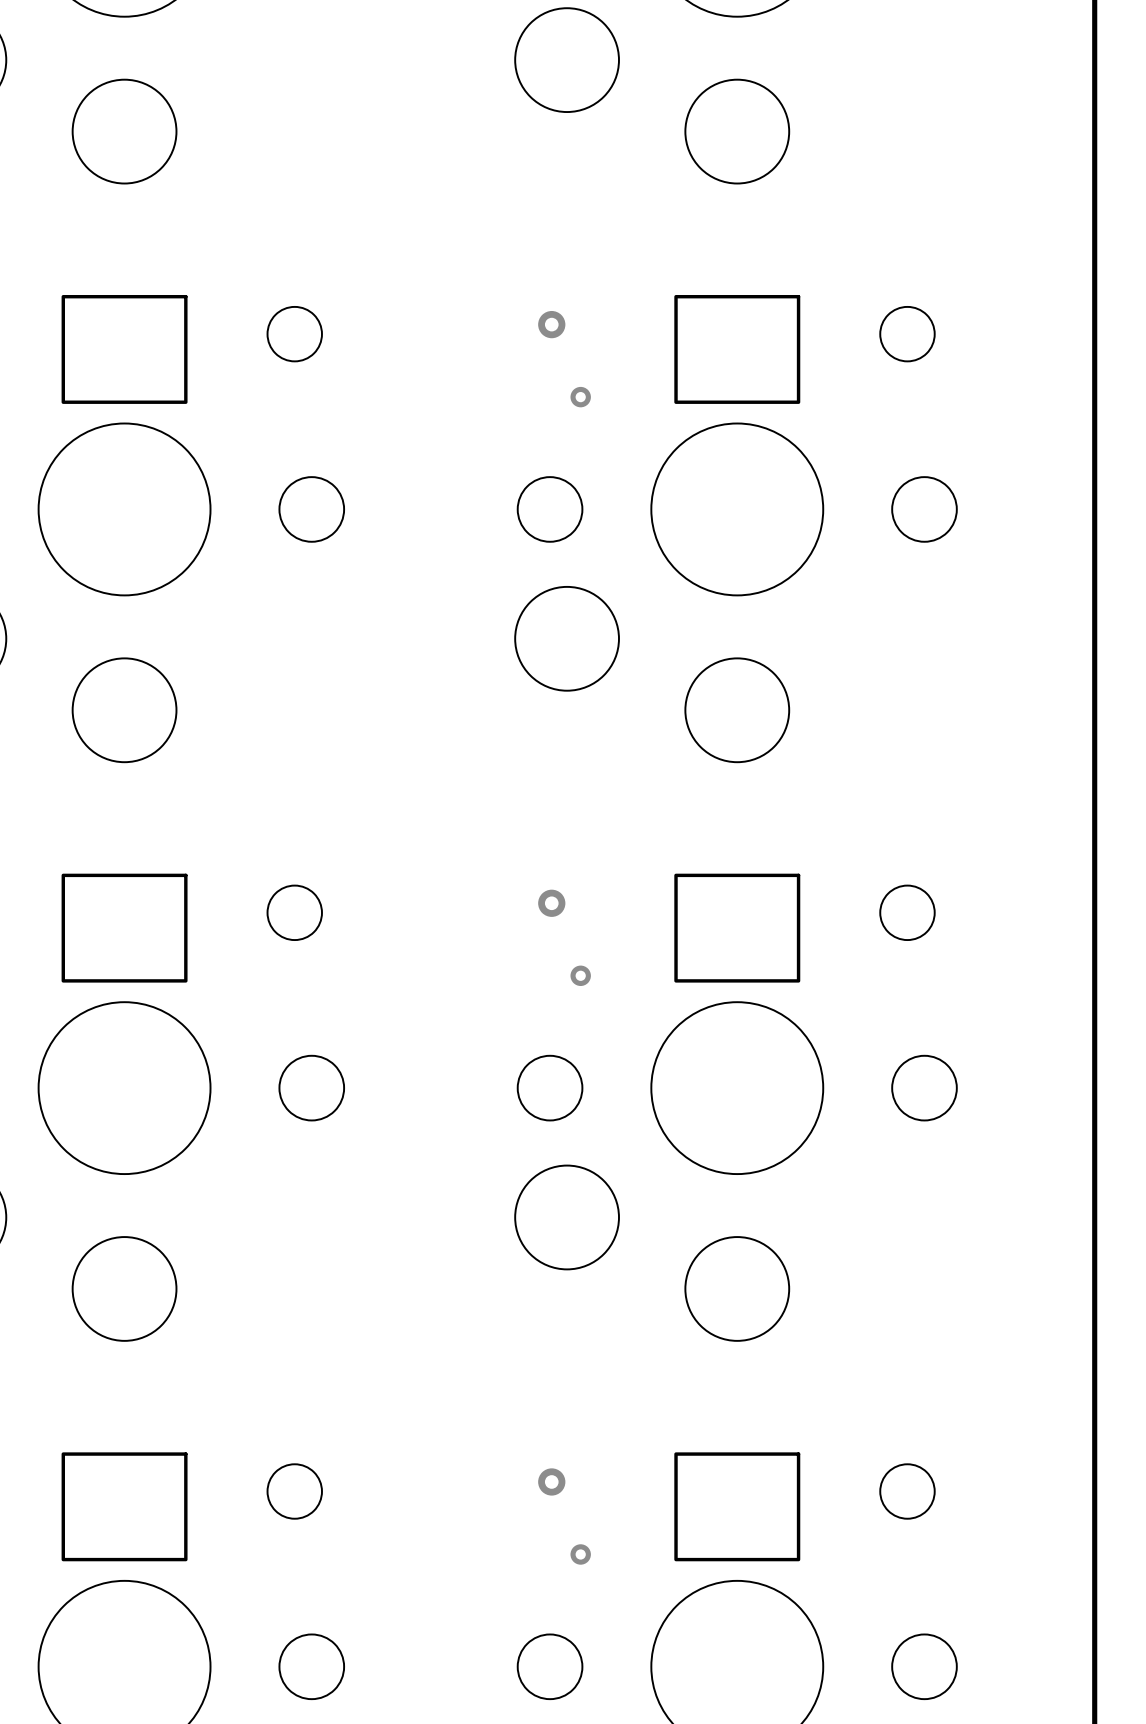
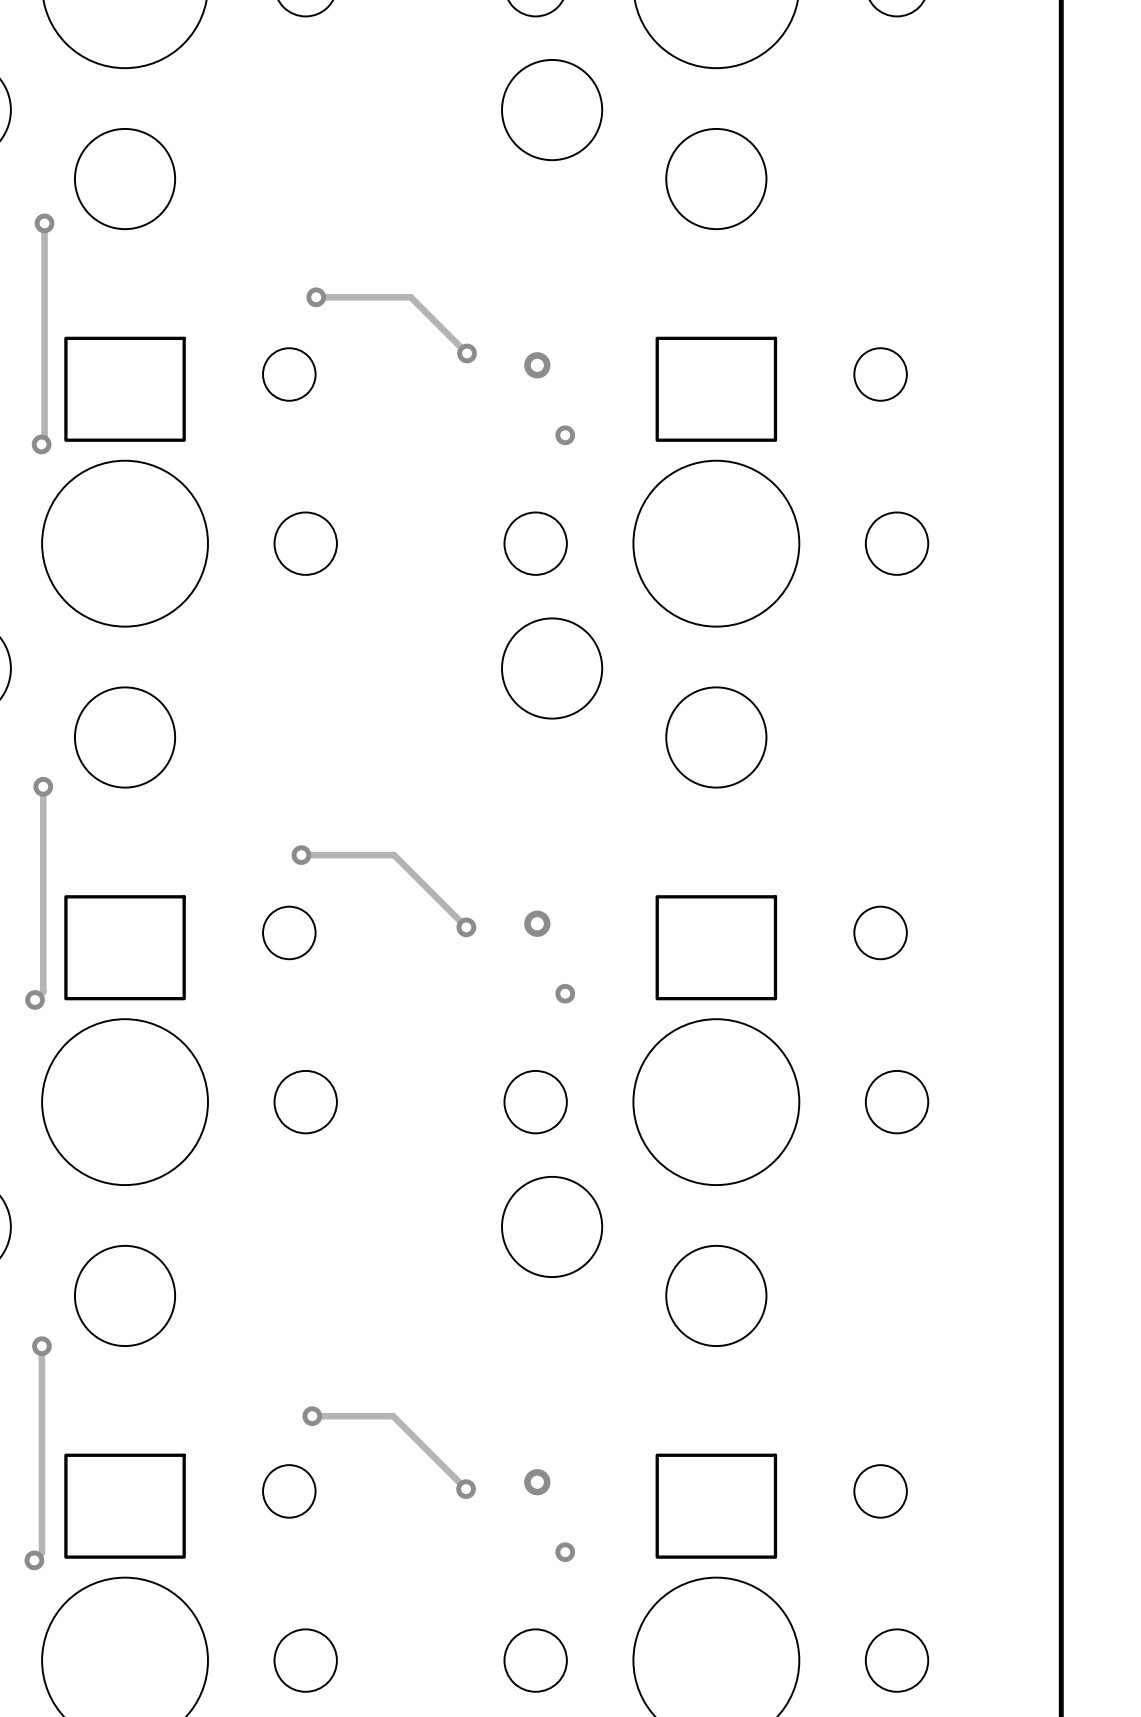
track: none -> (44, 223) (44, 441) (41, 444)
via: none -> (44, 223)
track: none -> (316, 297) (410, 297) (467, 353)
via: none -> (316, 297)
via: none -> (467, 353)
via: none -> (41, 444)
track: none -> (43, 786) (43, 991) (35, 999)
via: none -> (43, 786)
track: none -> (301, 855) (394, 855) (466, 927)
via: none -> (301, 855)
via: none -> (466, 927)
via: none -> (35, 999)
track: none -> (41, 1346) (41, 1552) (34, 1560)
via: none -> (41, 1346)
track: none -> (312, 1416) (393, 1416) (466, 1489)
via: none -> (312, 1416)
via: none -> (466, 1489)
via: none -> (34, 1560)

